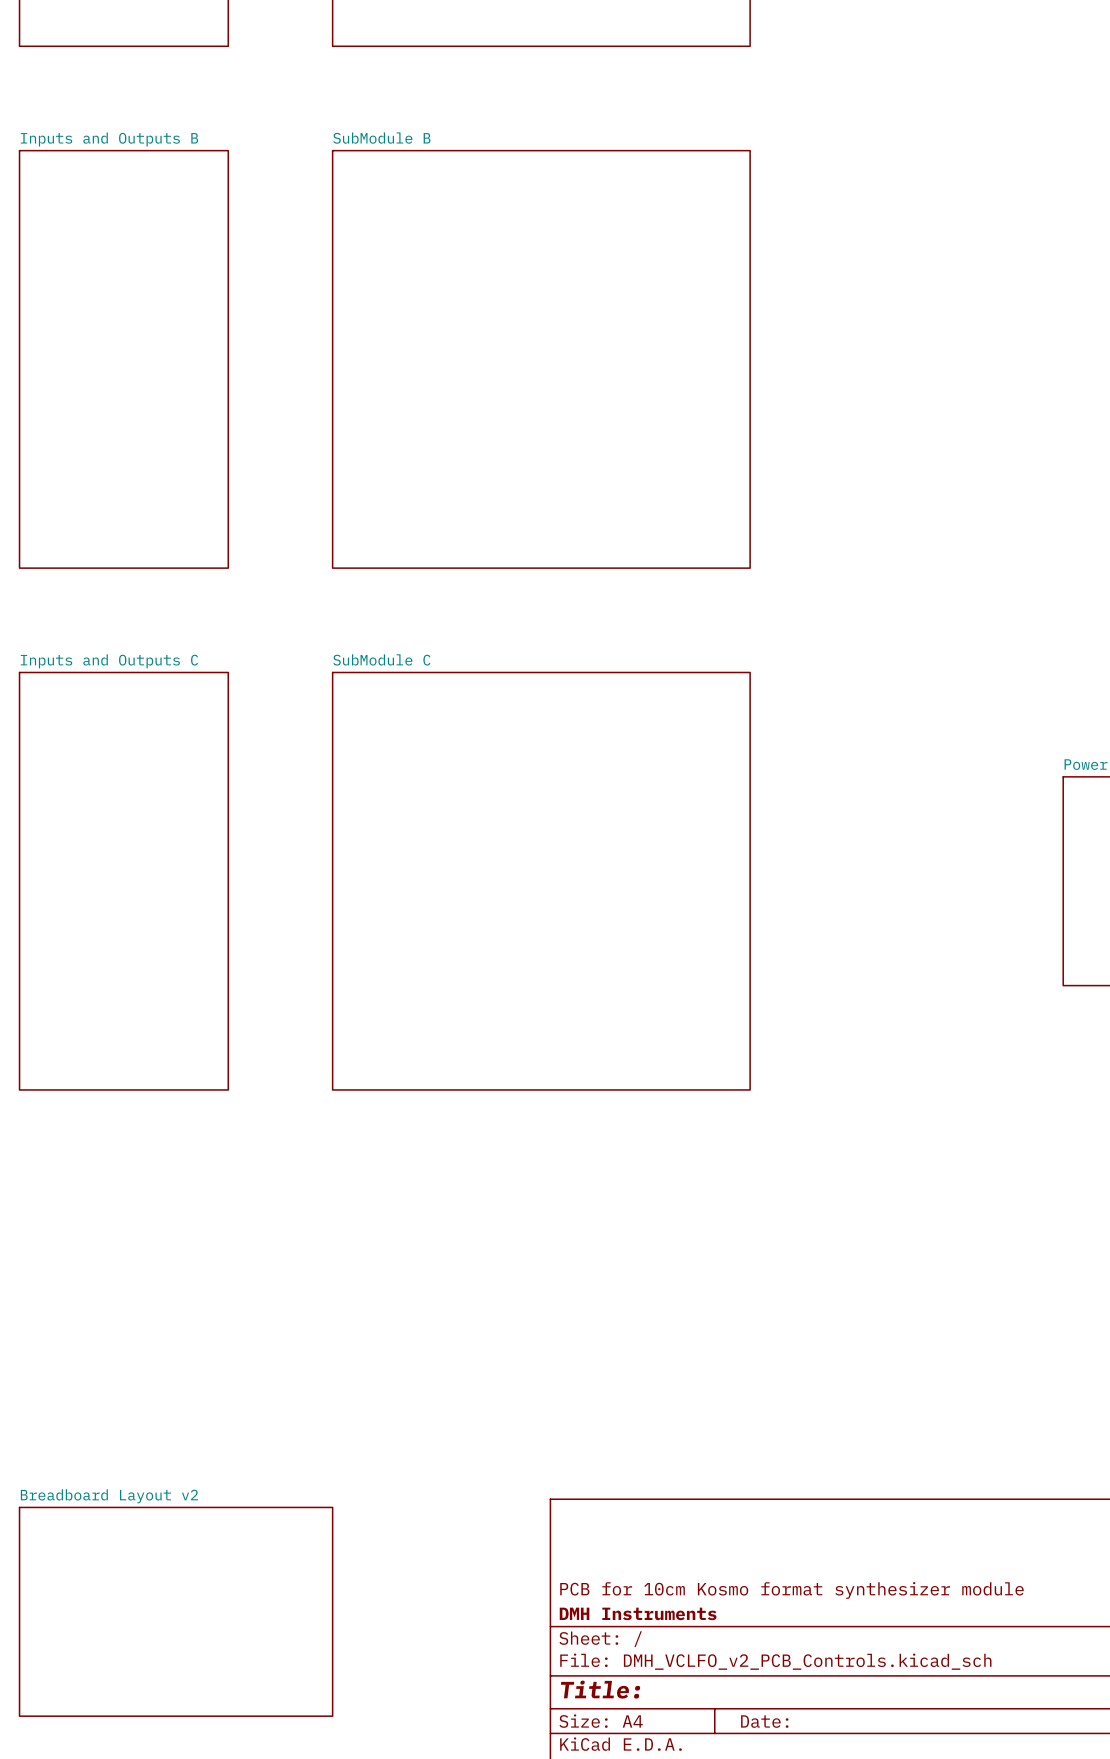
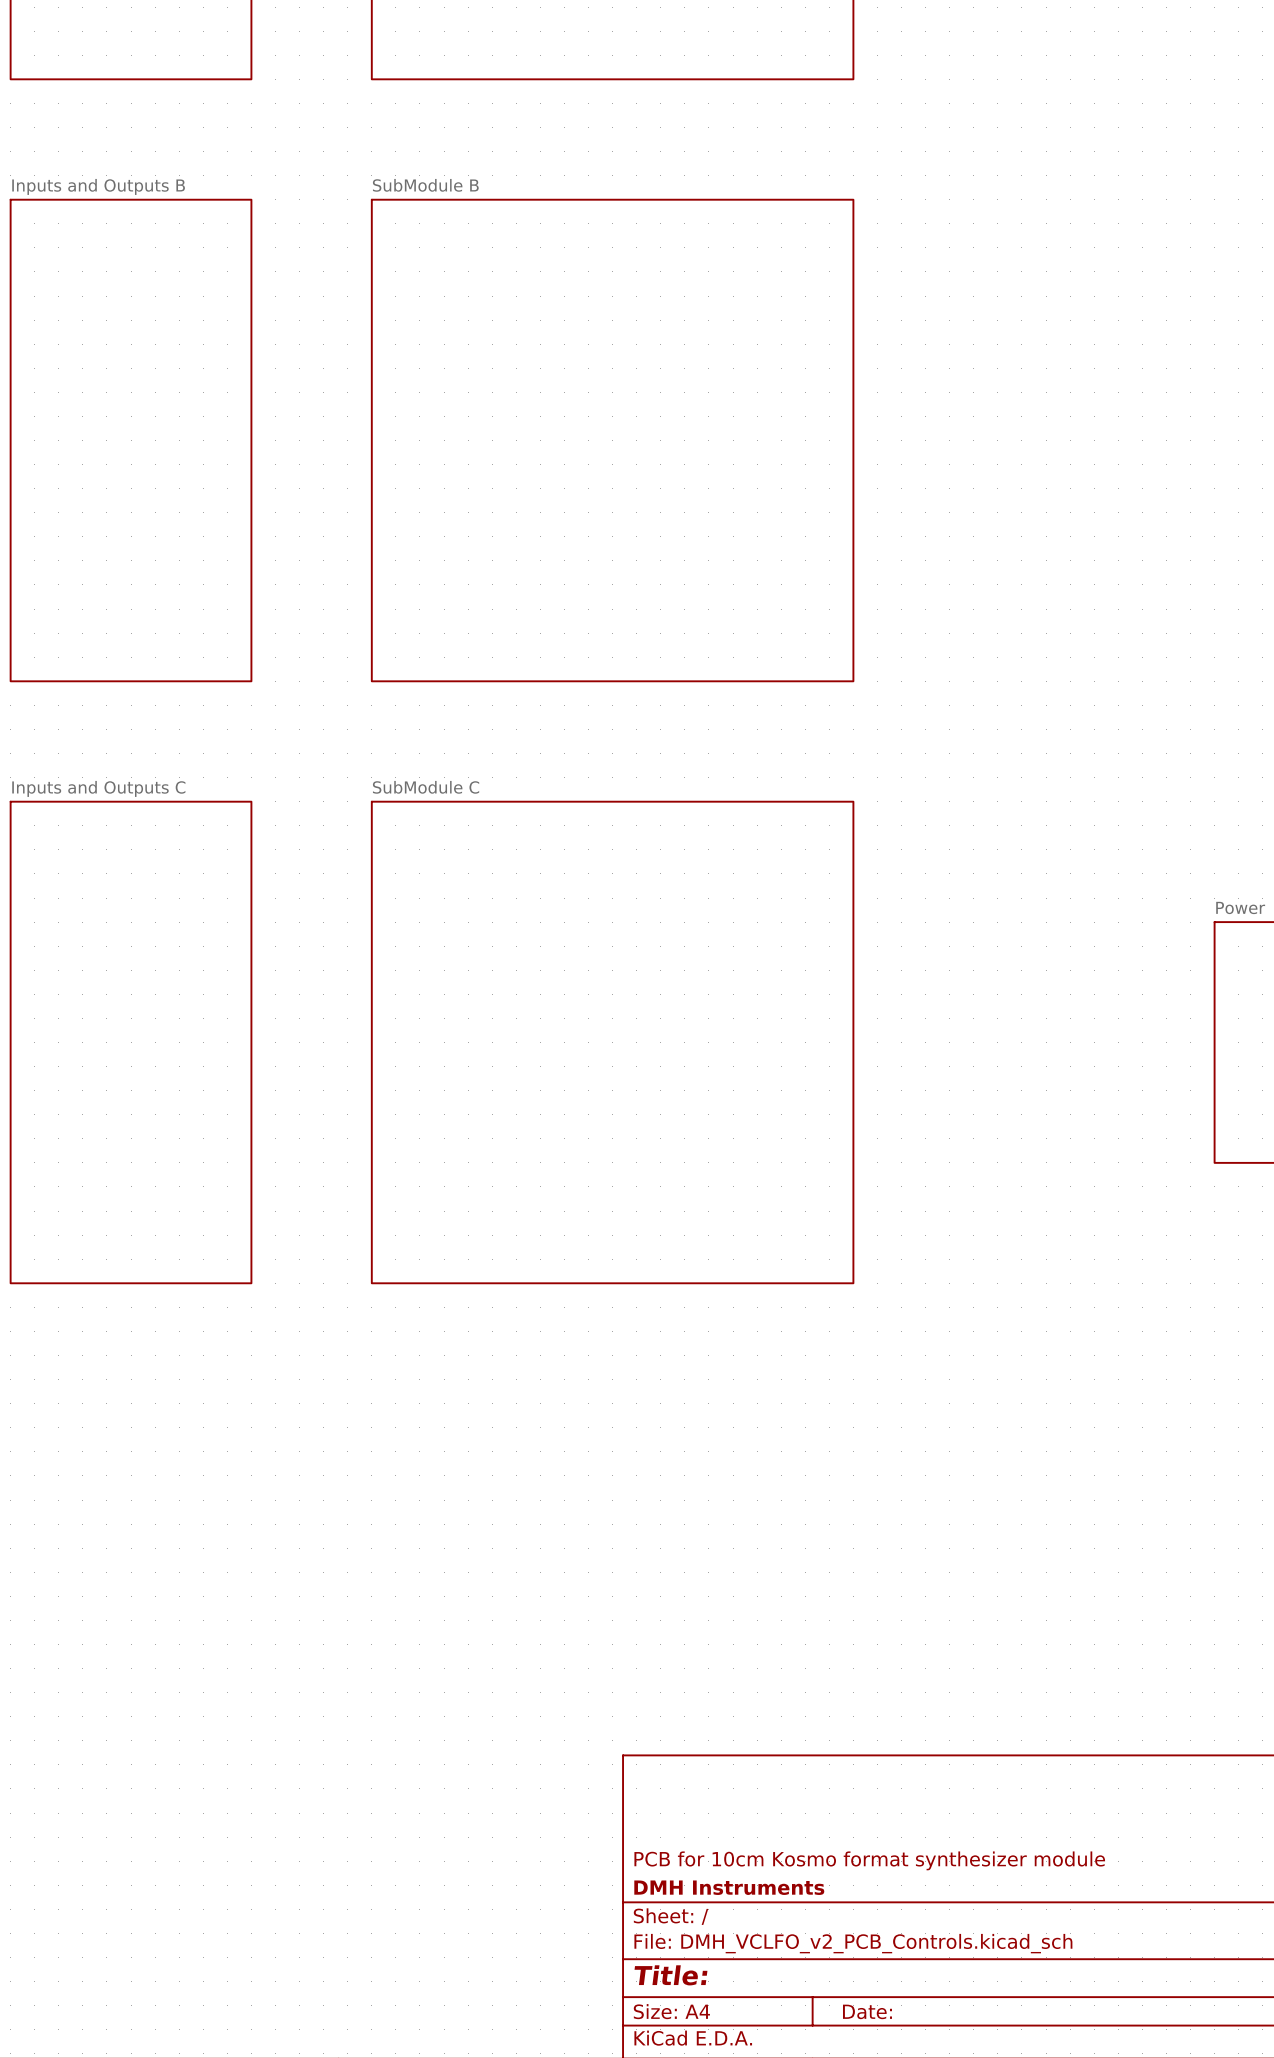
sheet Breadboard Layout v2: (176, 1611) -> none

